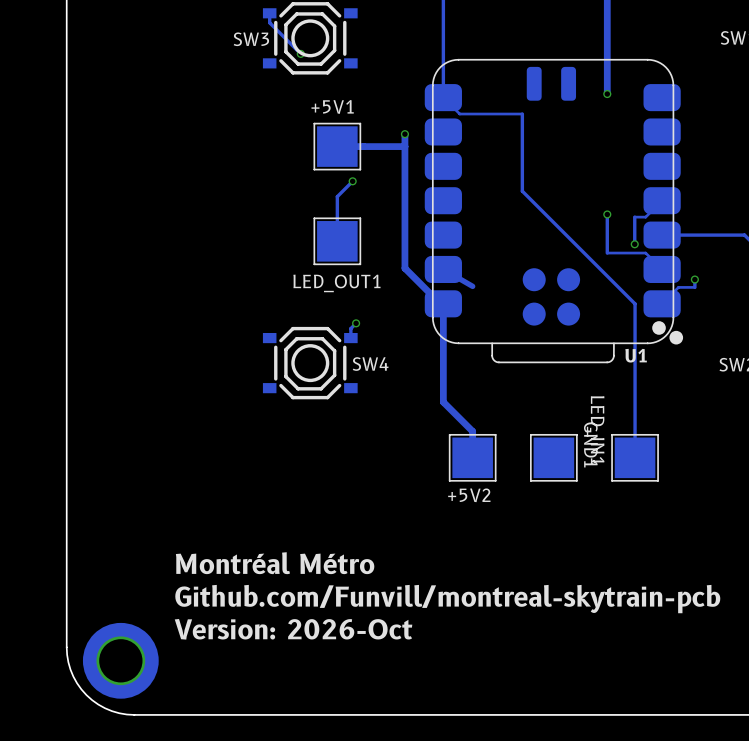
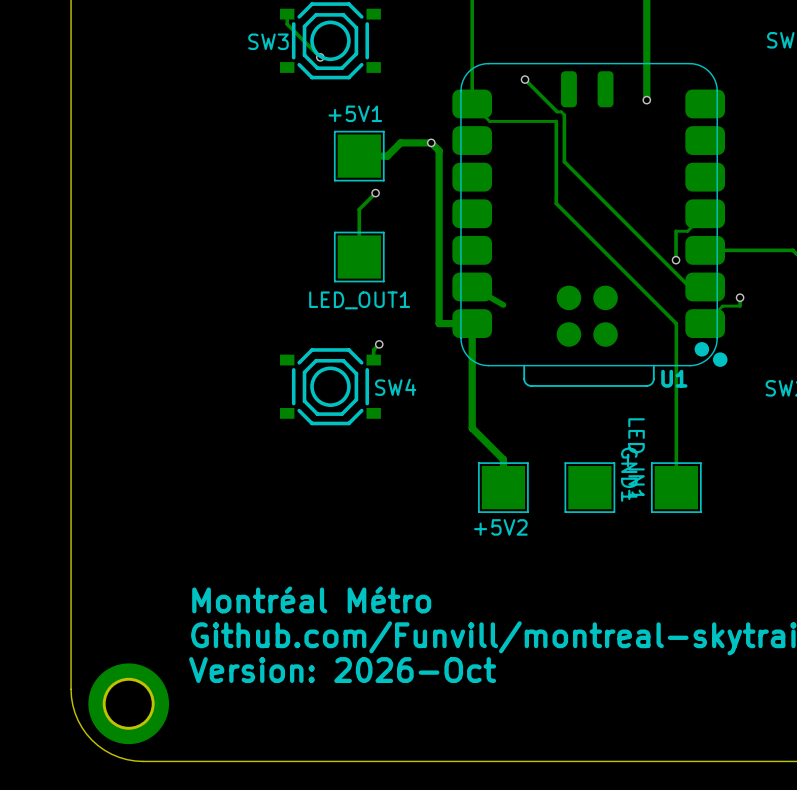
via: none -> (525, 79)
track: (404, 134) (404, 268) (440, 303) -> (387, 156) (400, 142) (431, 142) (439, 150) (439, 323) (469, 323)
track: (404, 146) (363, 146) -> none
track: (607, 214) (607, 253) (645, 253) (662, 269) -> (525, 79) (557, 111) (561, 111) (564, 114) (564, 161) (689, 286) (705, 286)
via: (607, 214) -> none

